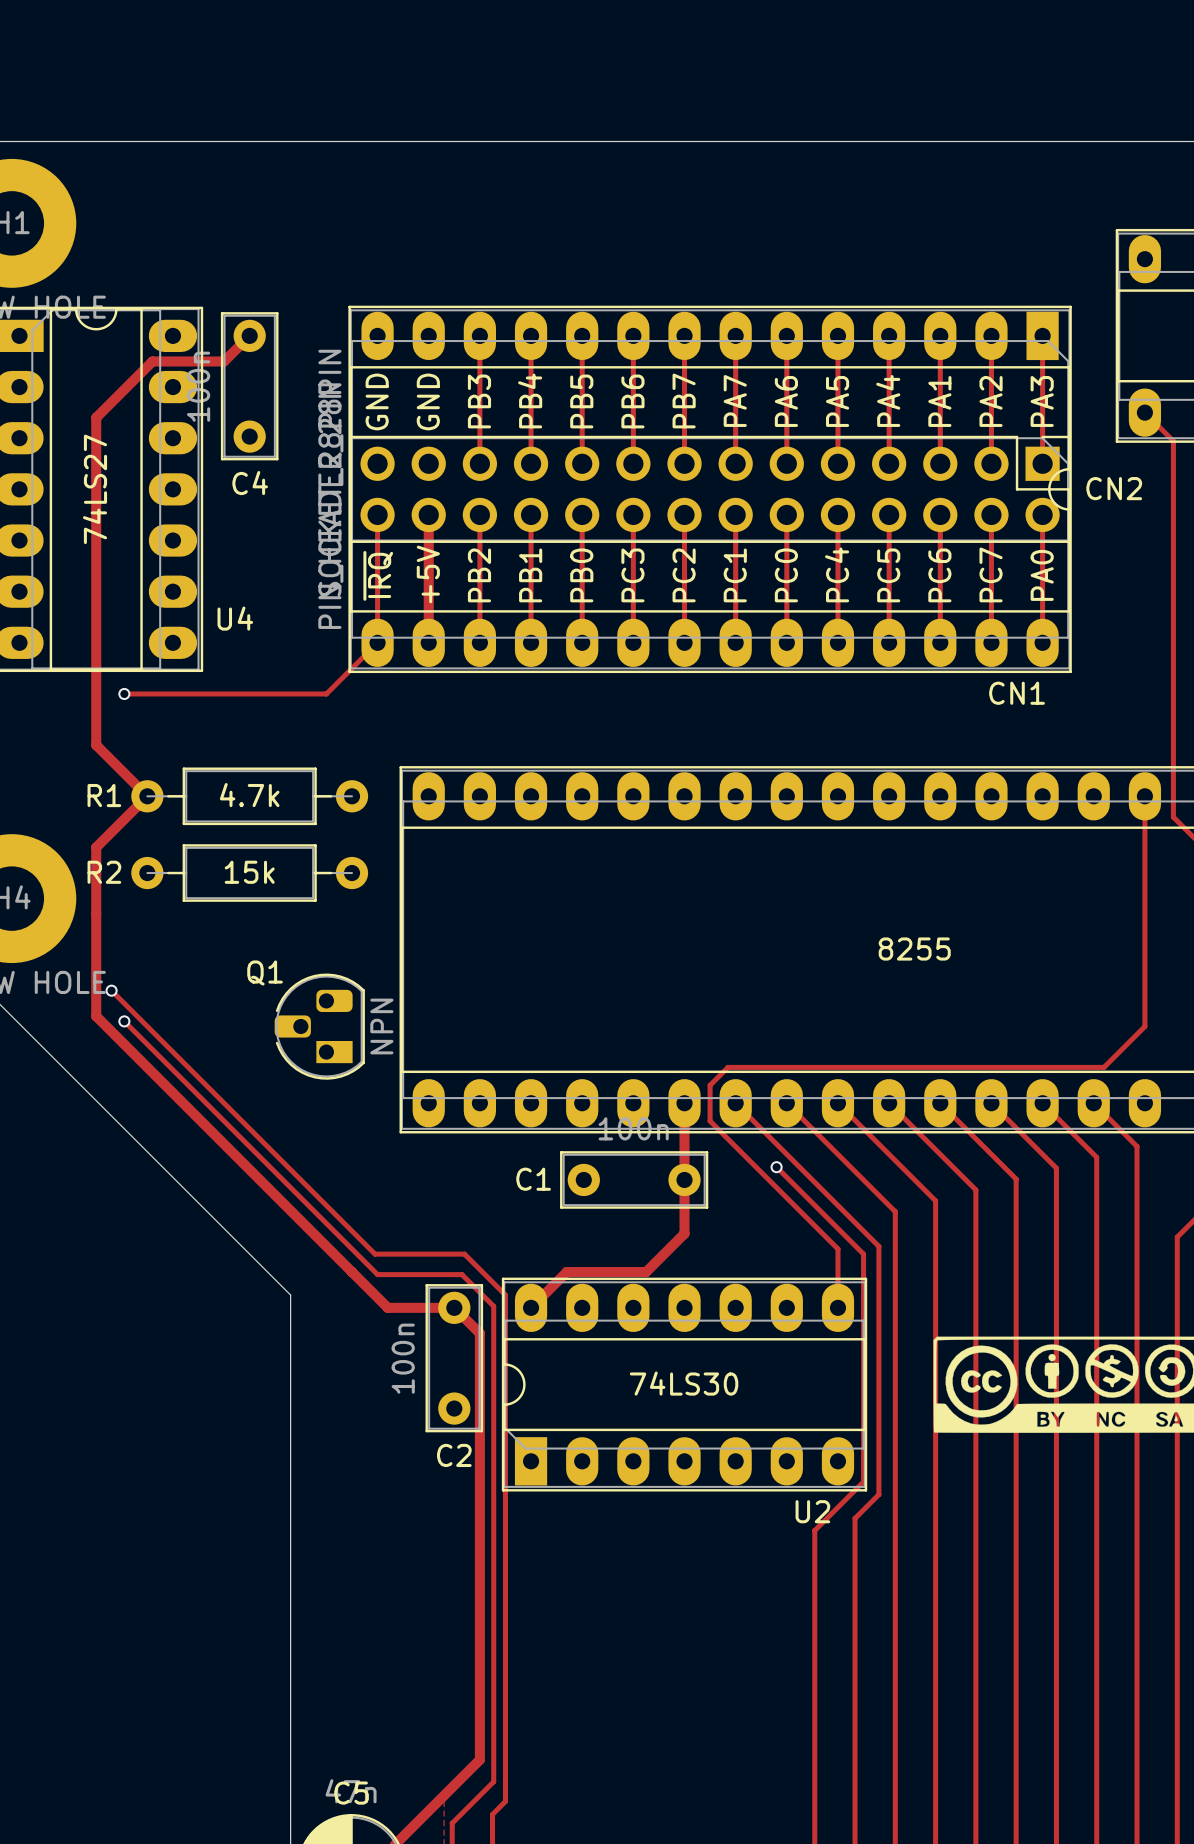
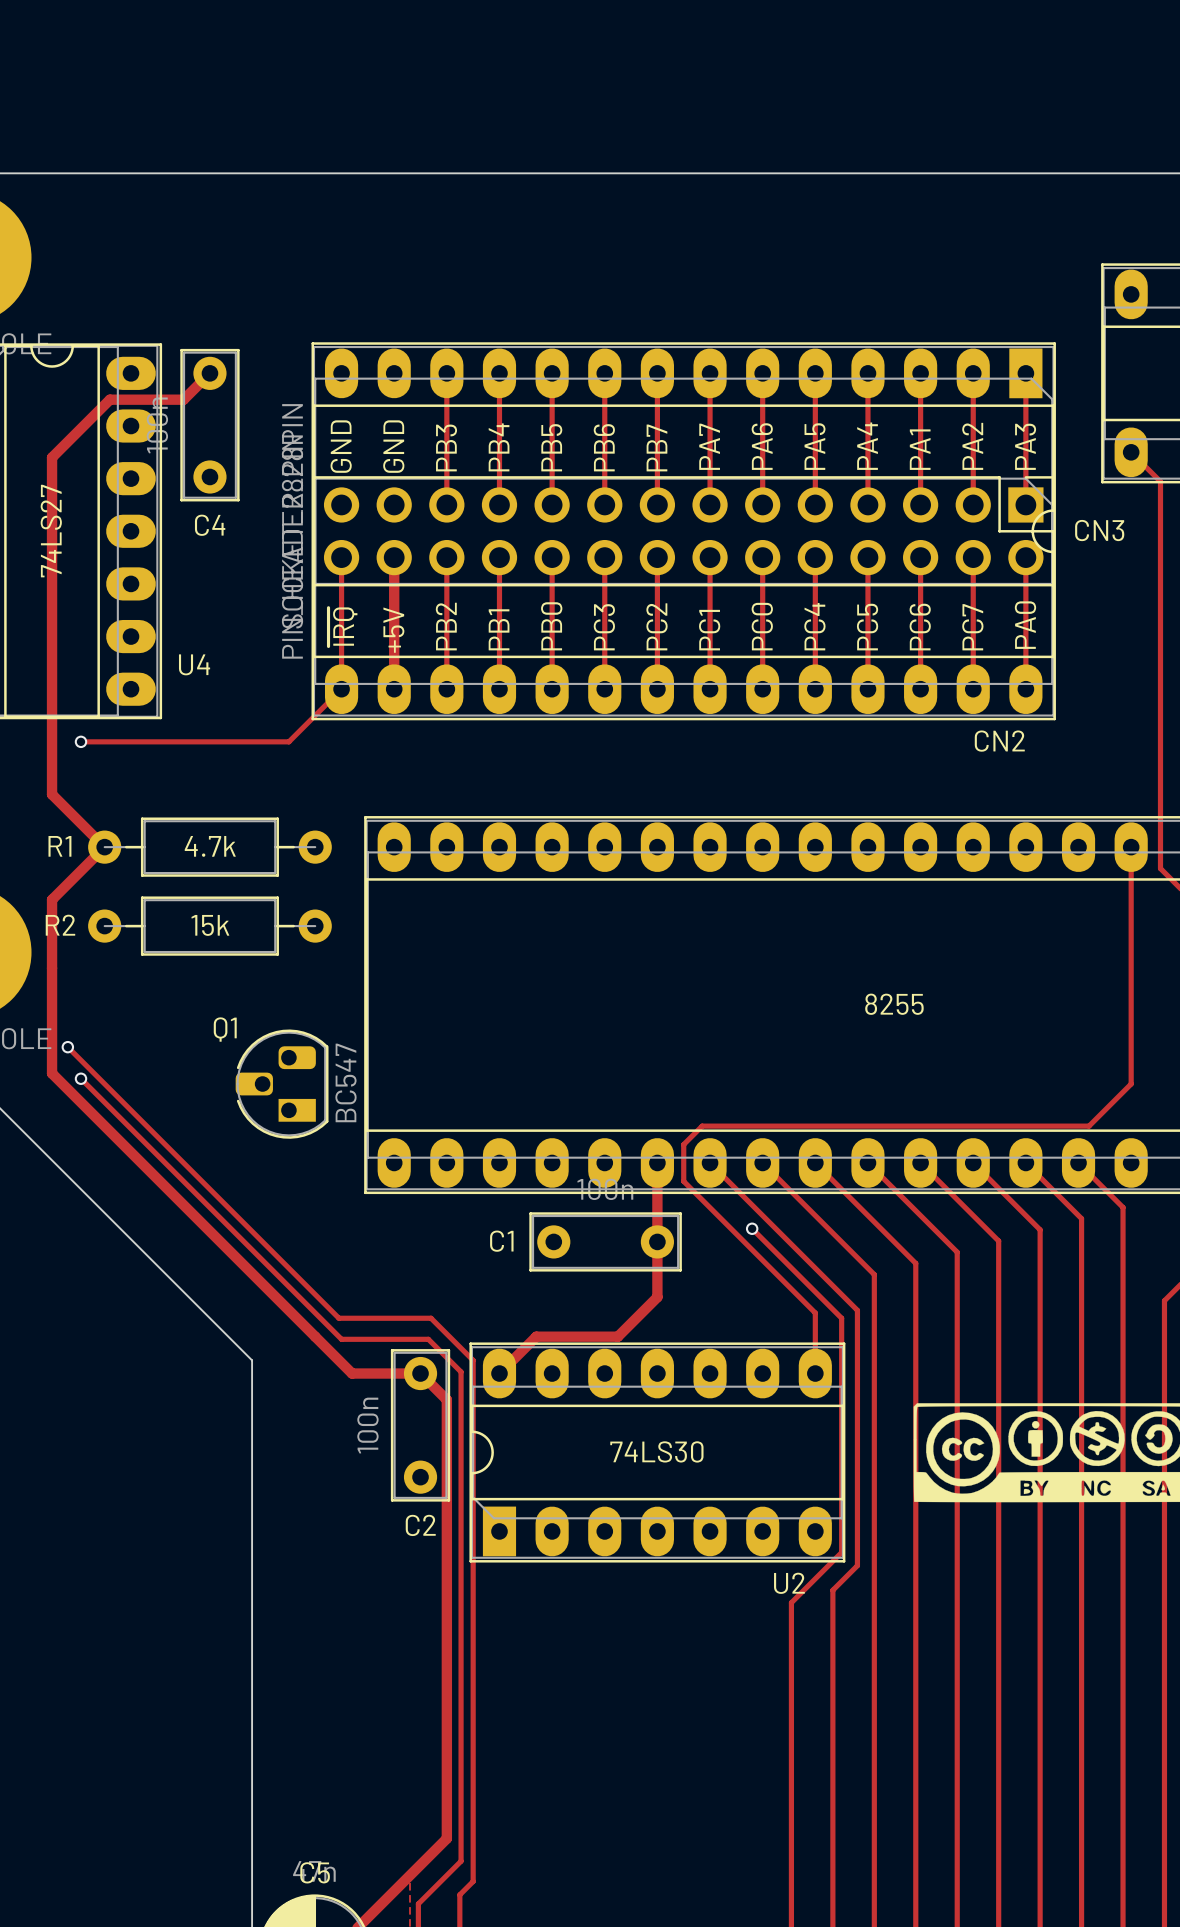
CN2 name: CN2 (1114, 488) -> CN3 (1099, 530)
CN1 name: CN1 (1017, 693) -> CN2 (999, 741)
Q1 value: NPN (381, 1026) -> BC547 (345, 1082)

